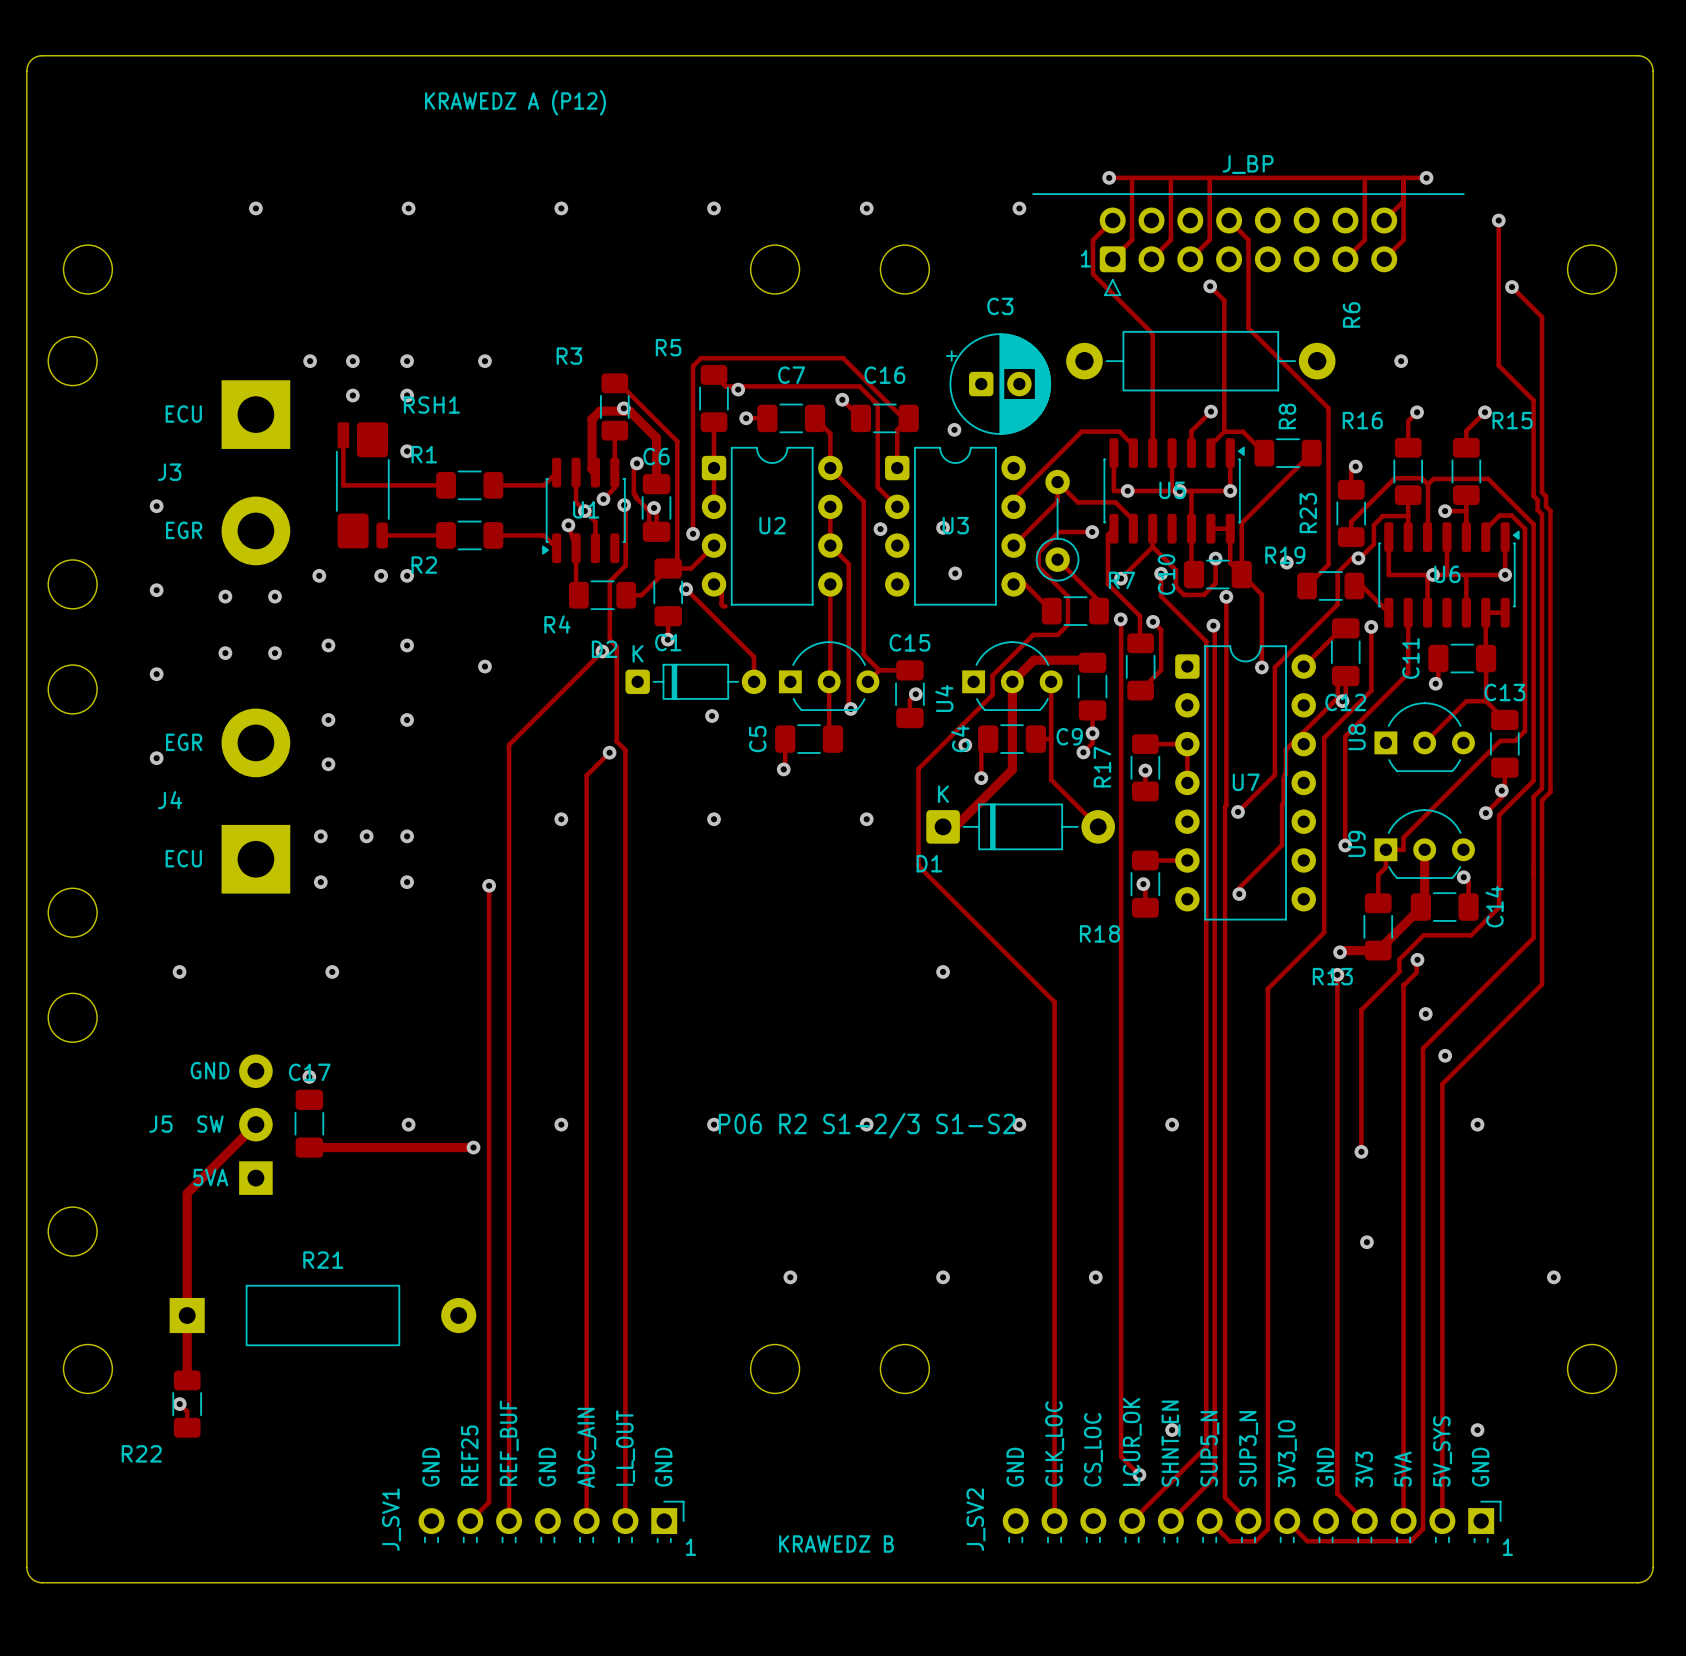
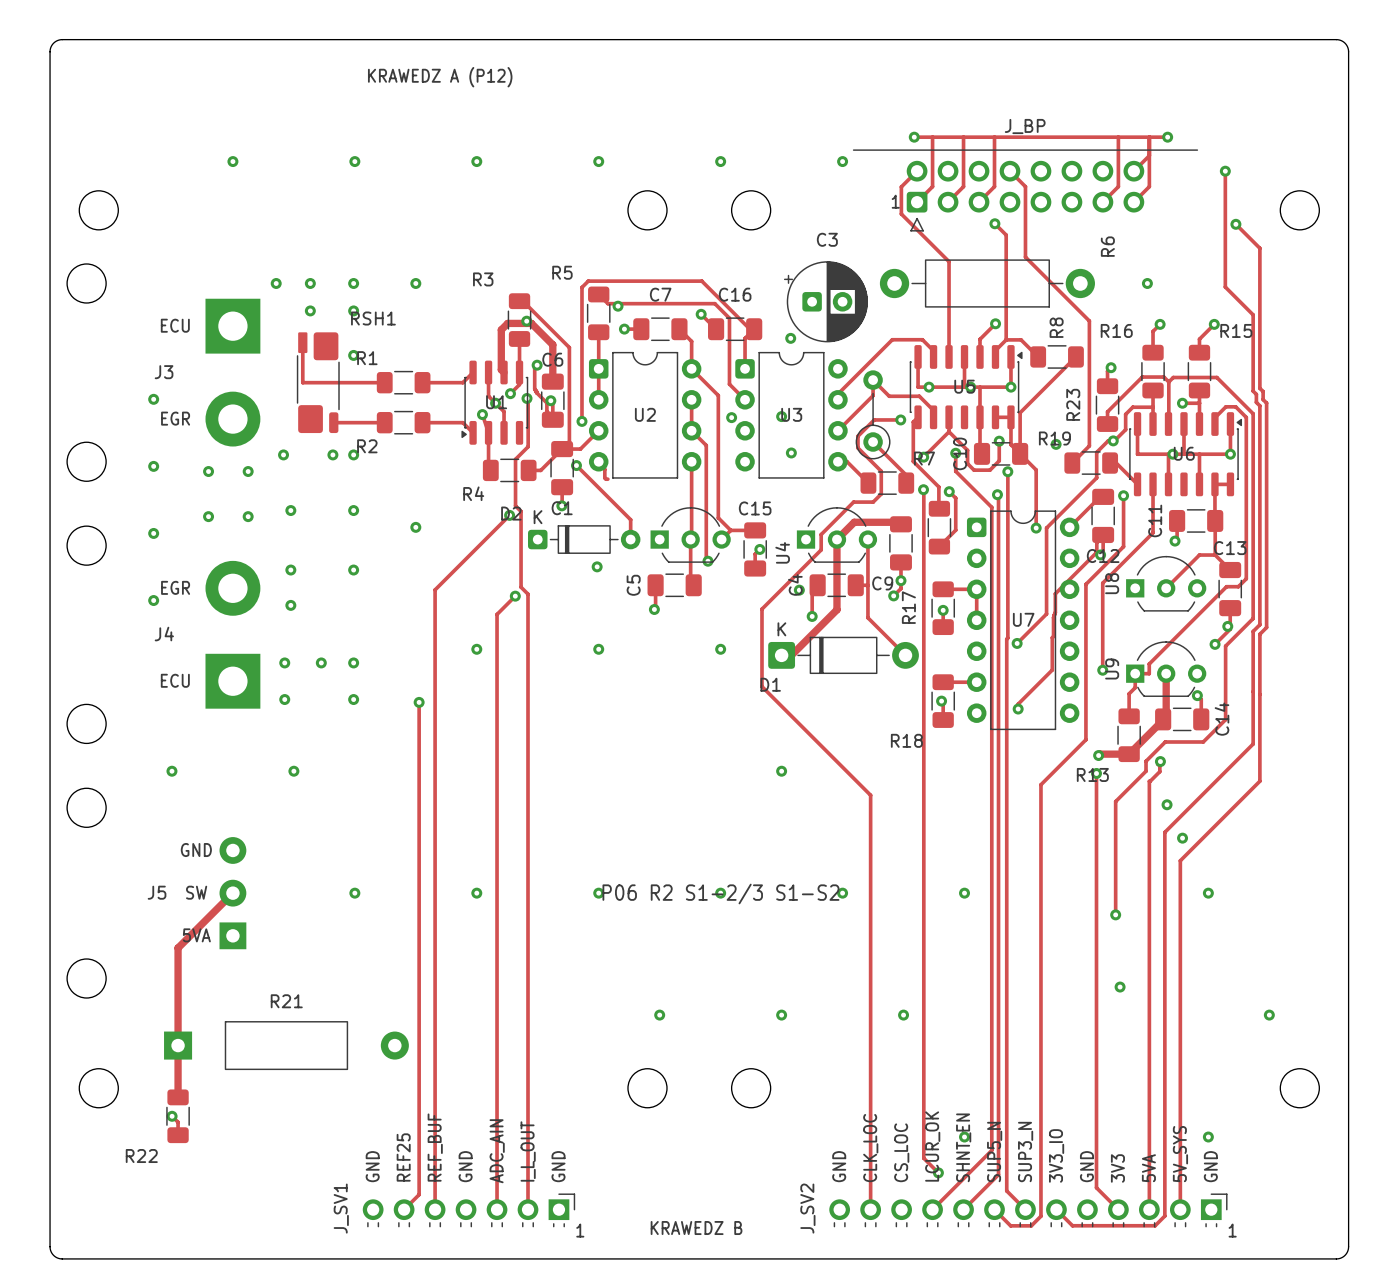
via: (309, 1076) -> none
C17: (309, 1123) -> none
track: (309, 1147) (473, 1147) -> none
via: (473, 1147) -> none

